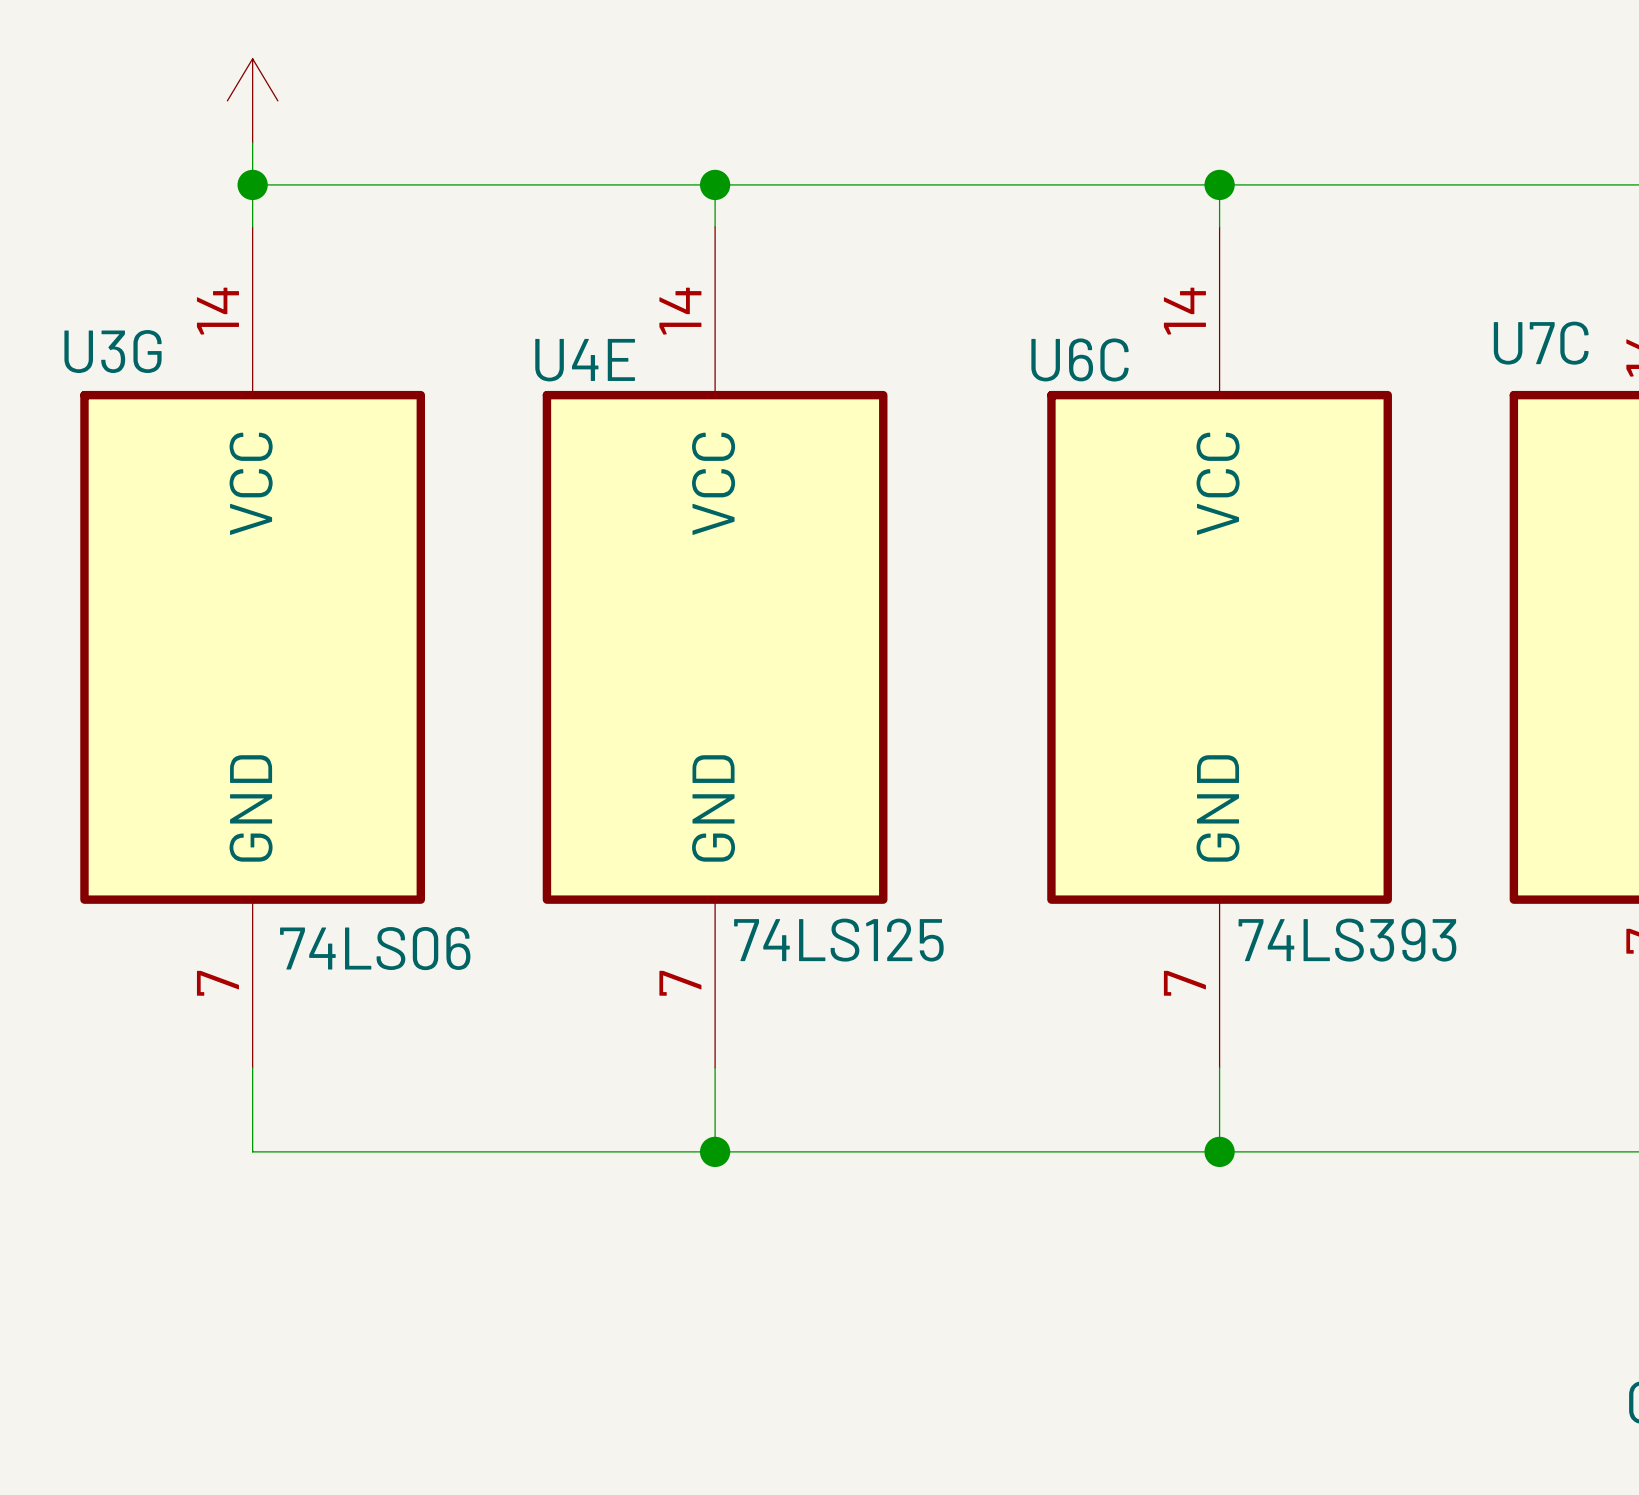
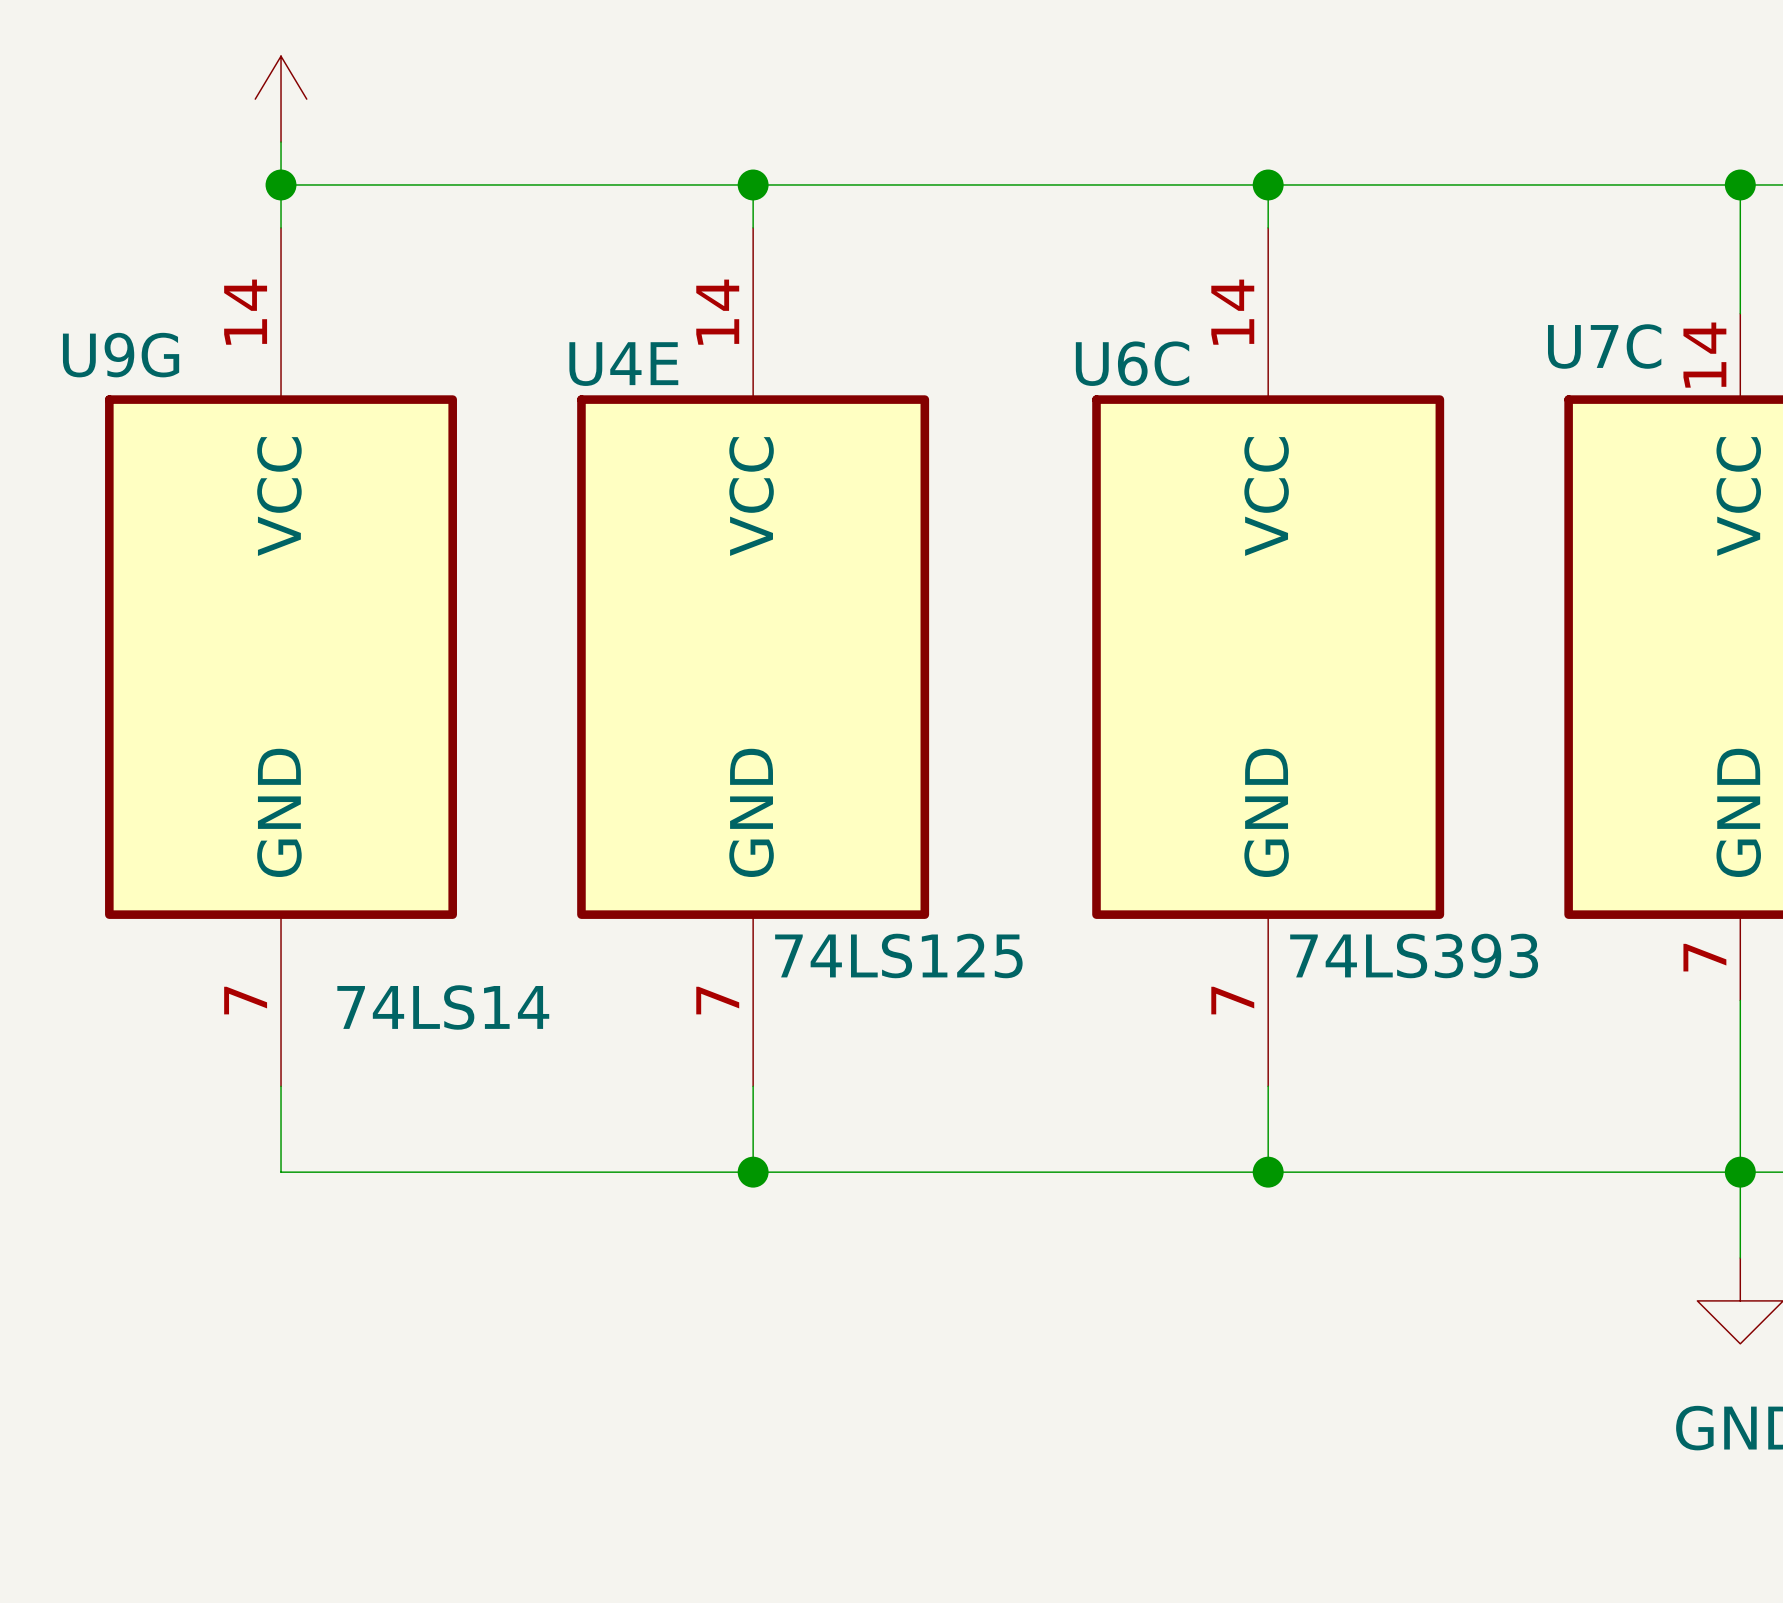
U3G name: U3G (113, 351) -> U9G (121, 355)
U3G value: 74LS06 (375, 948) -> 74LS14 (443, 1007)

